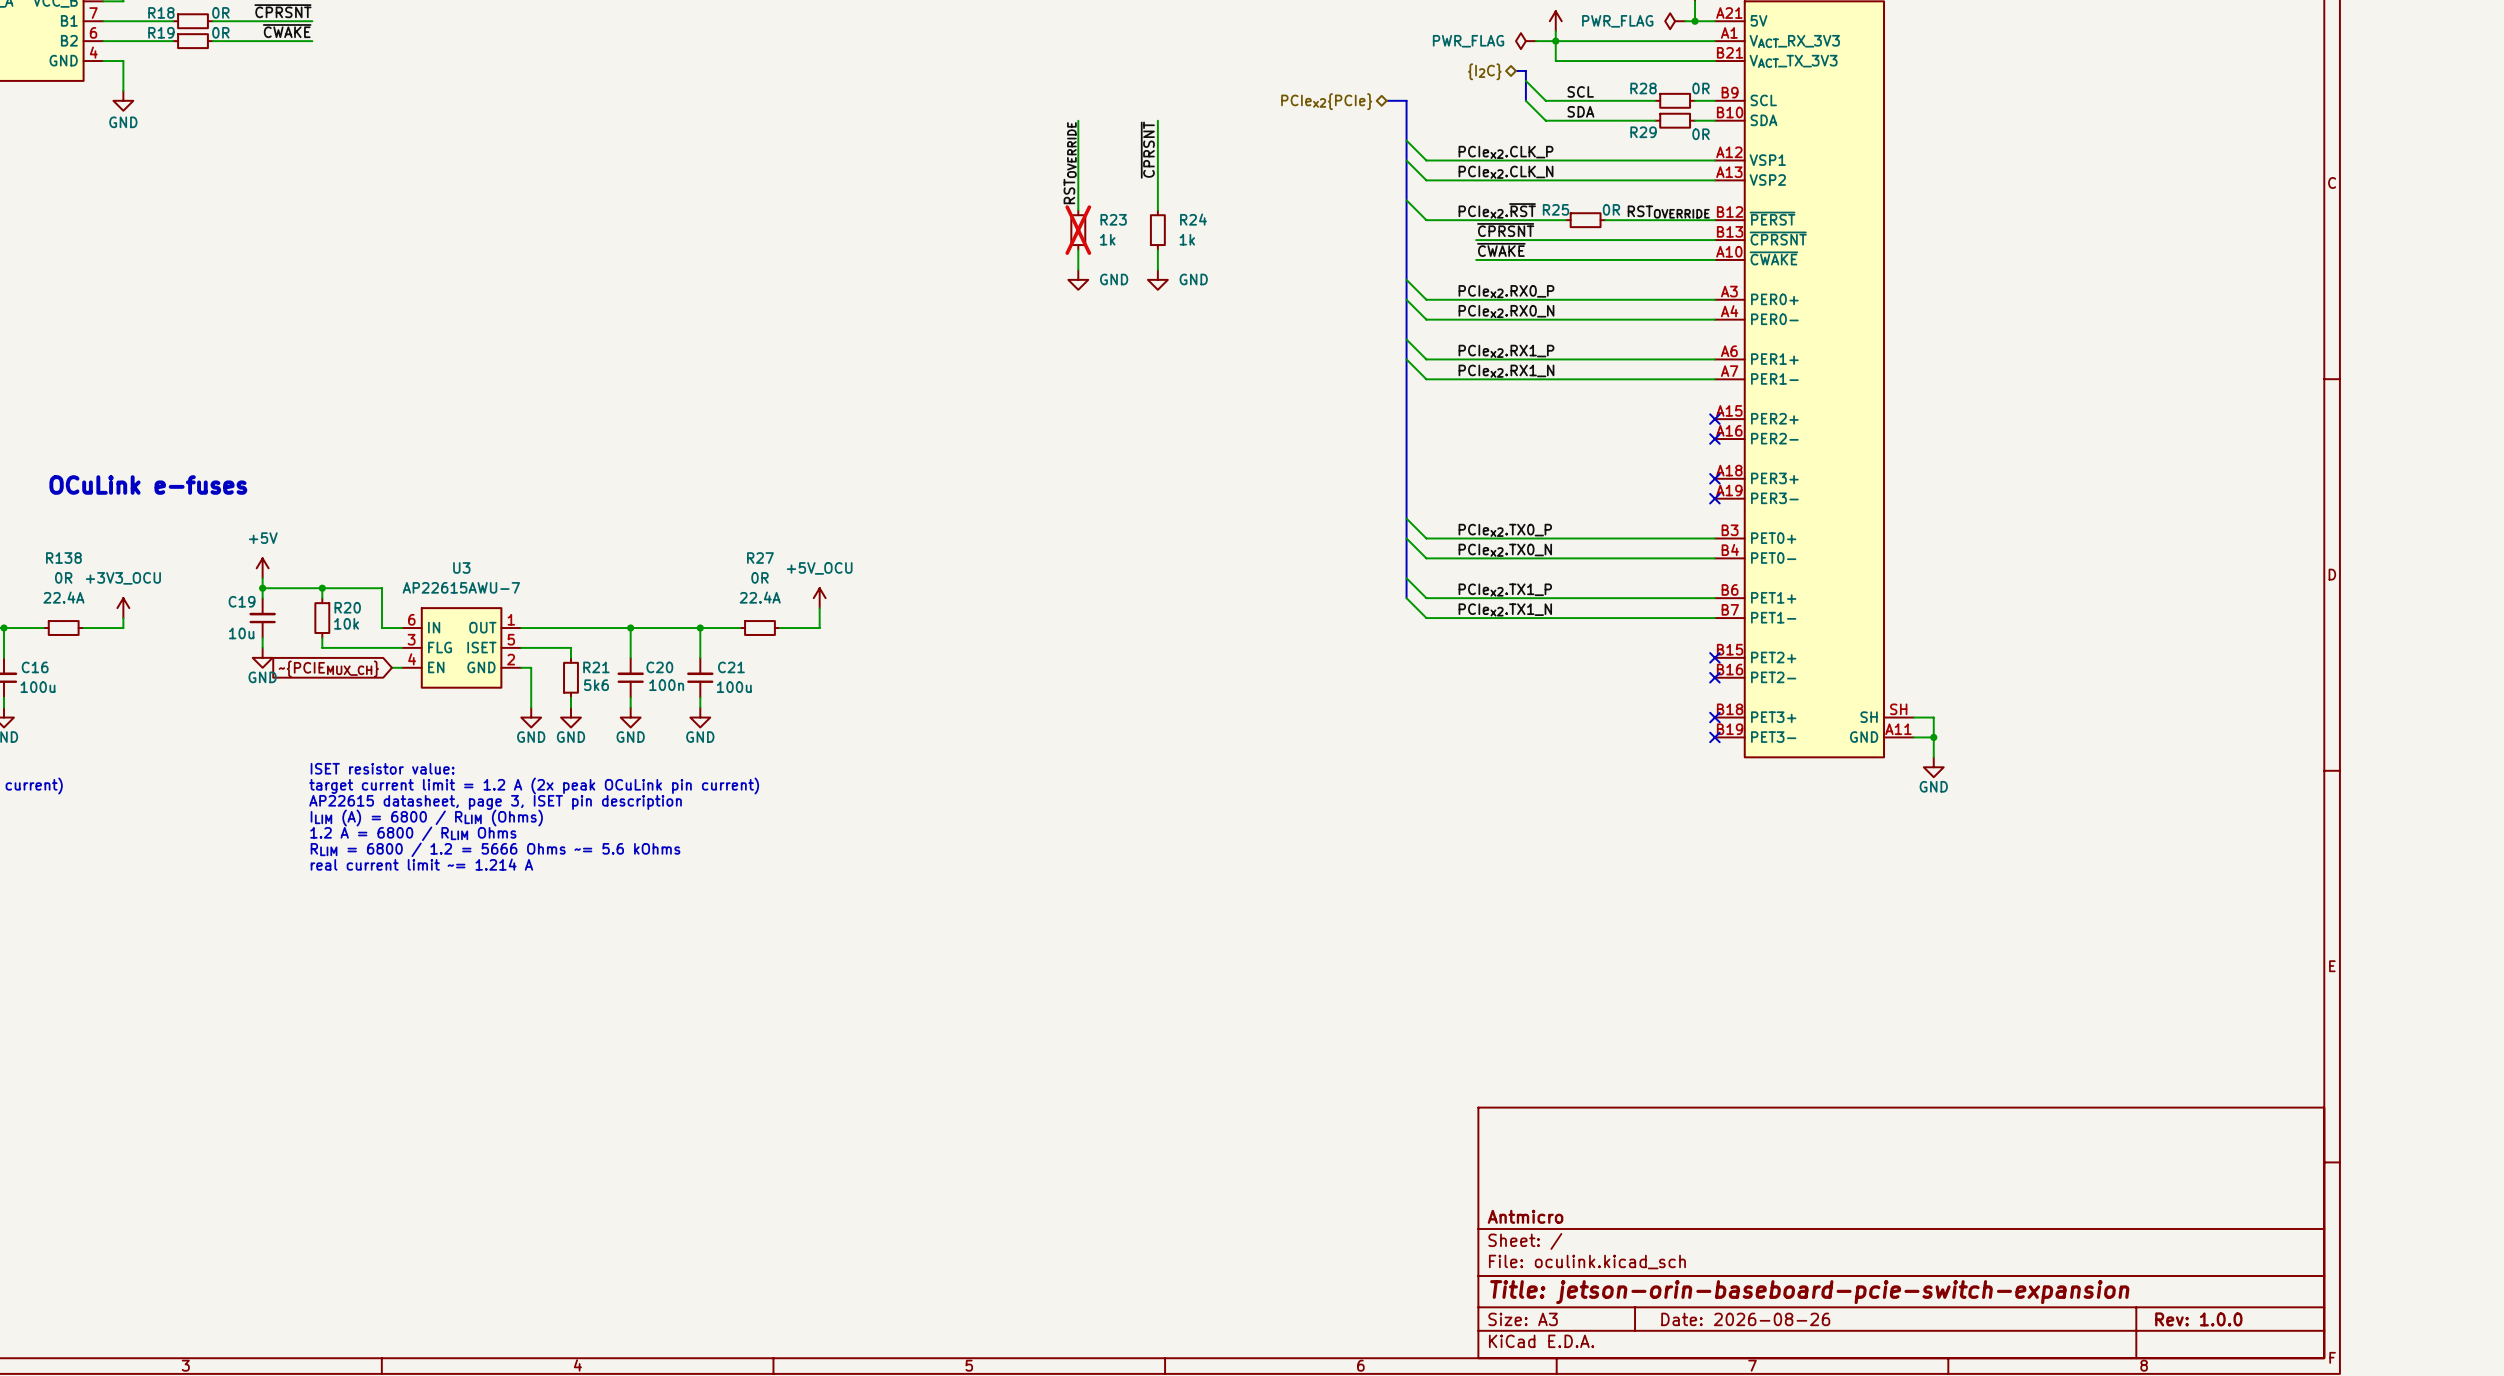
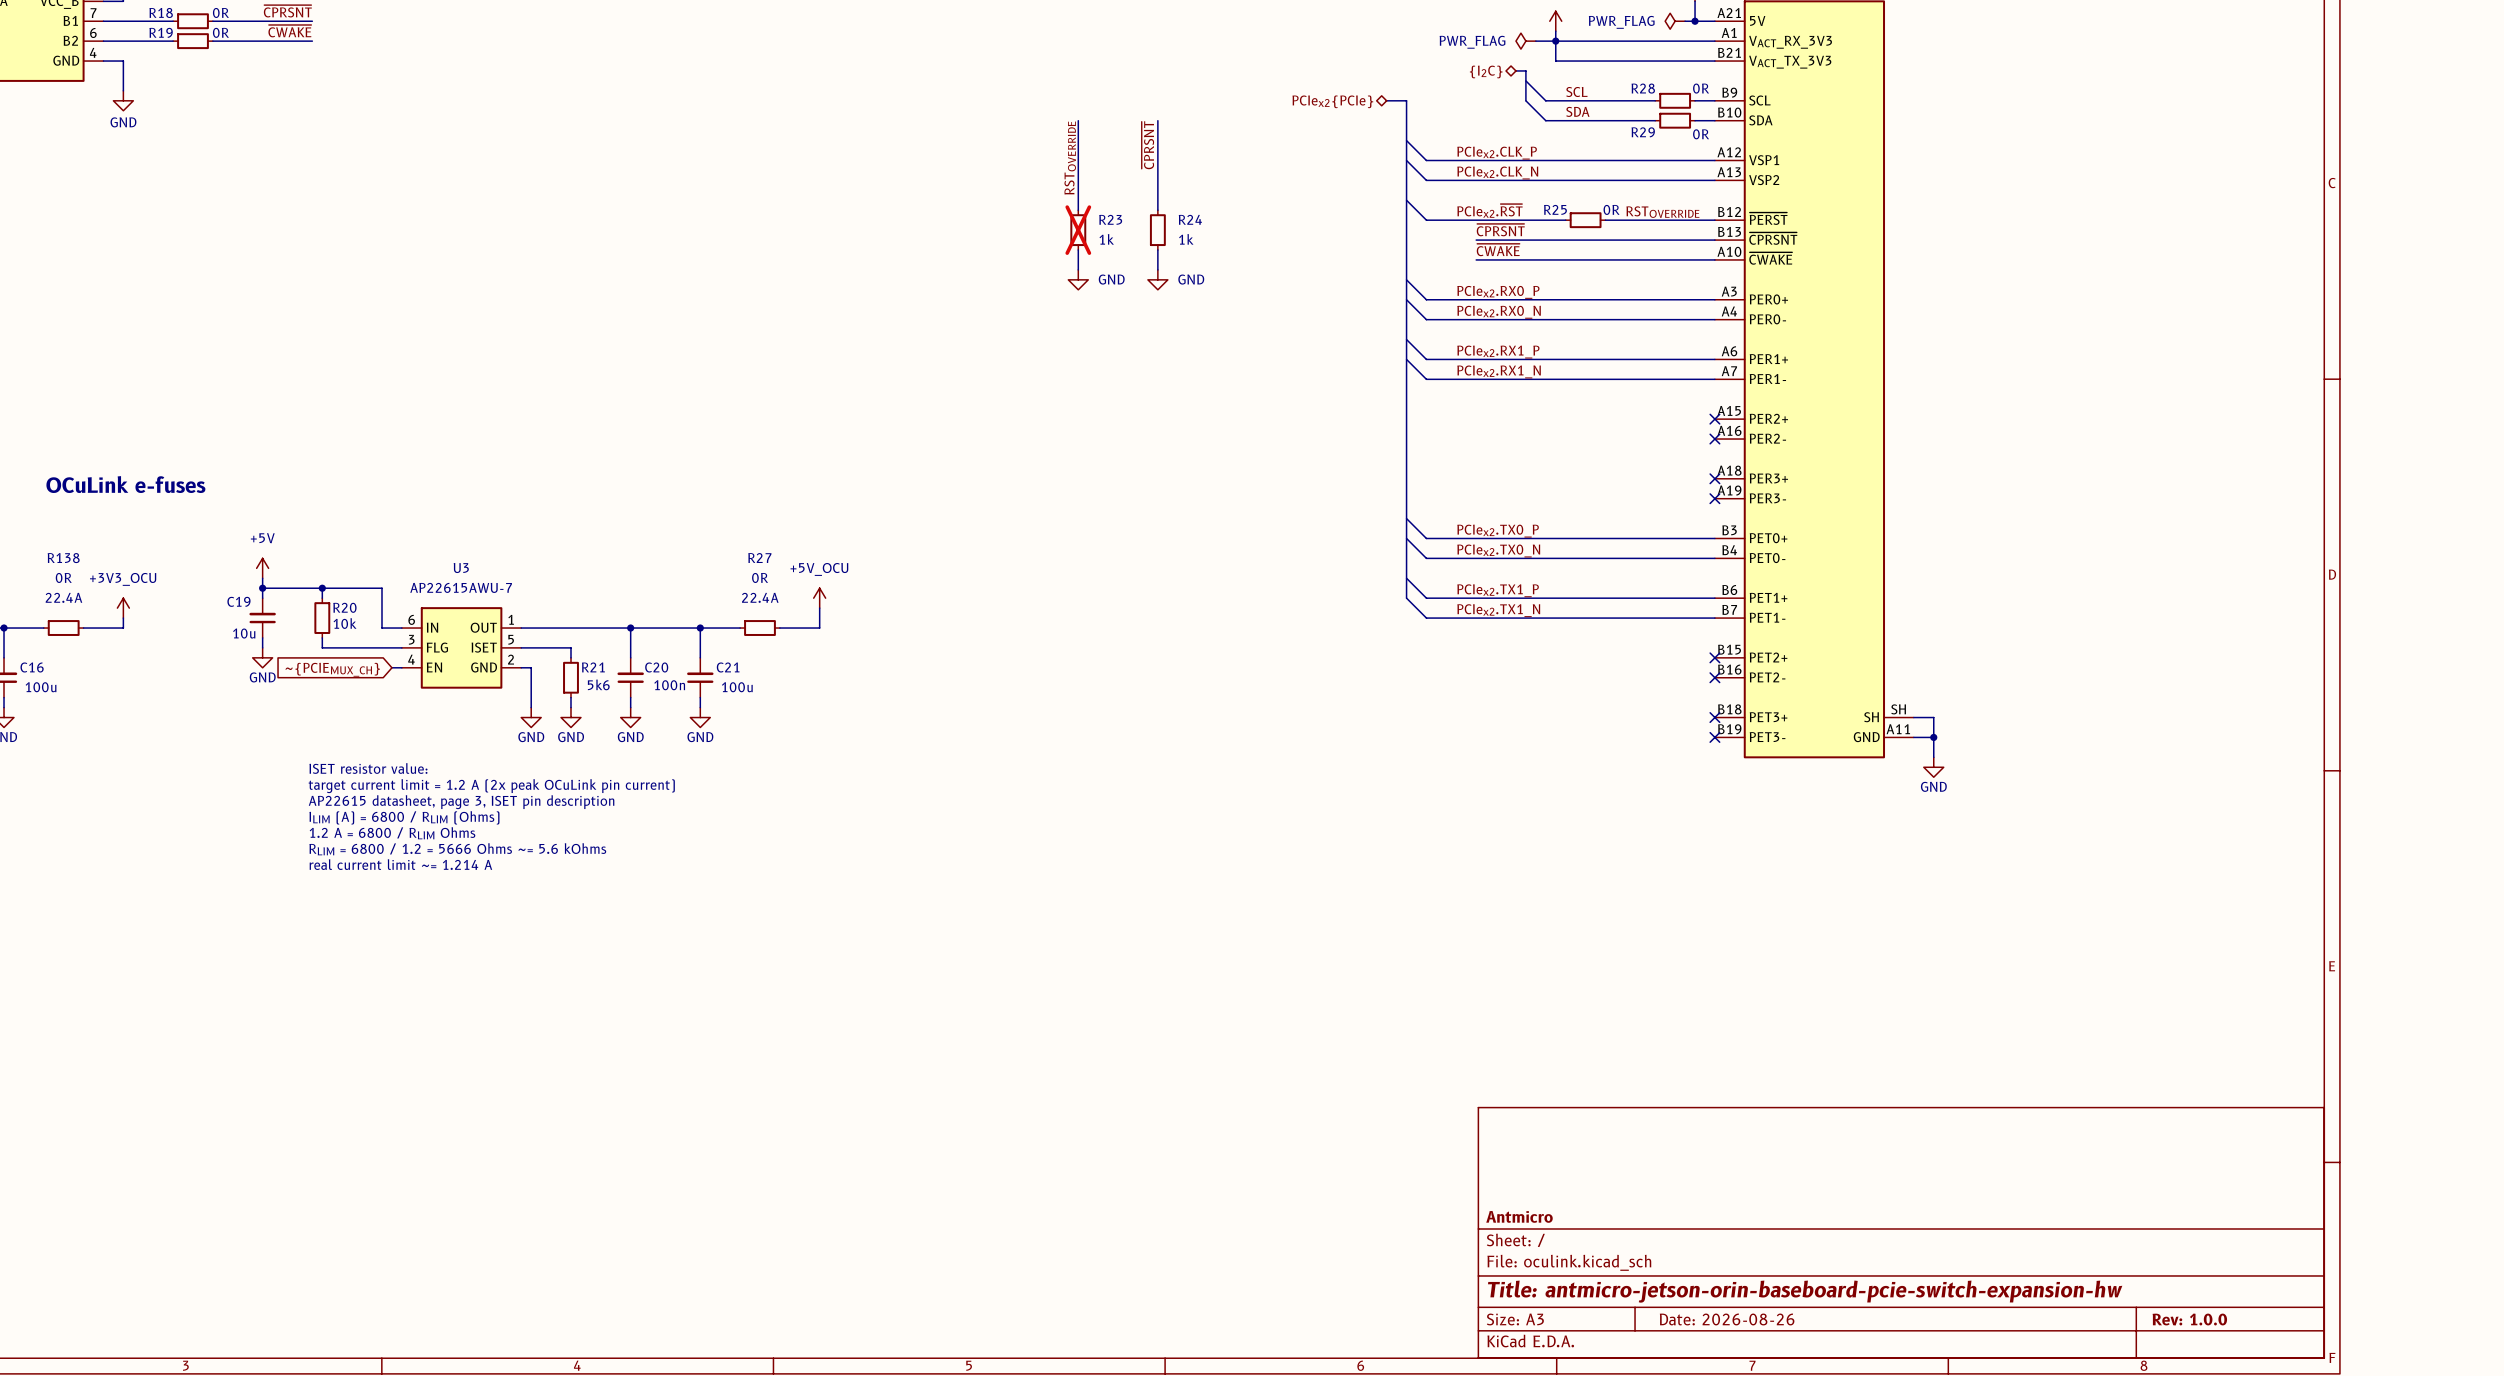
title block: Title: jetson-orin-baseboard-pcie-switch-expansion (1809, 1292) -> Title: antmicro-jetson-orin-baseboard-pcie-switch-expansion-hw (1805, 1291)

